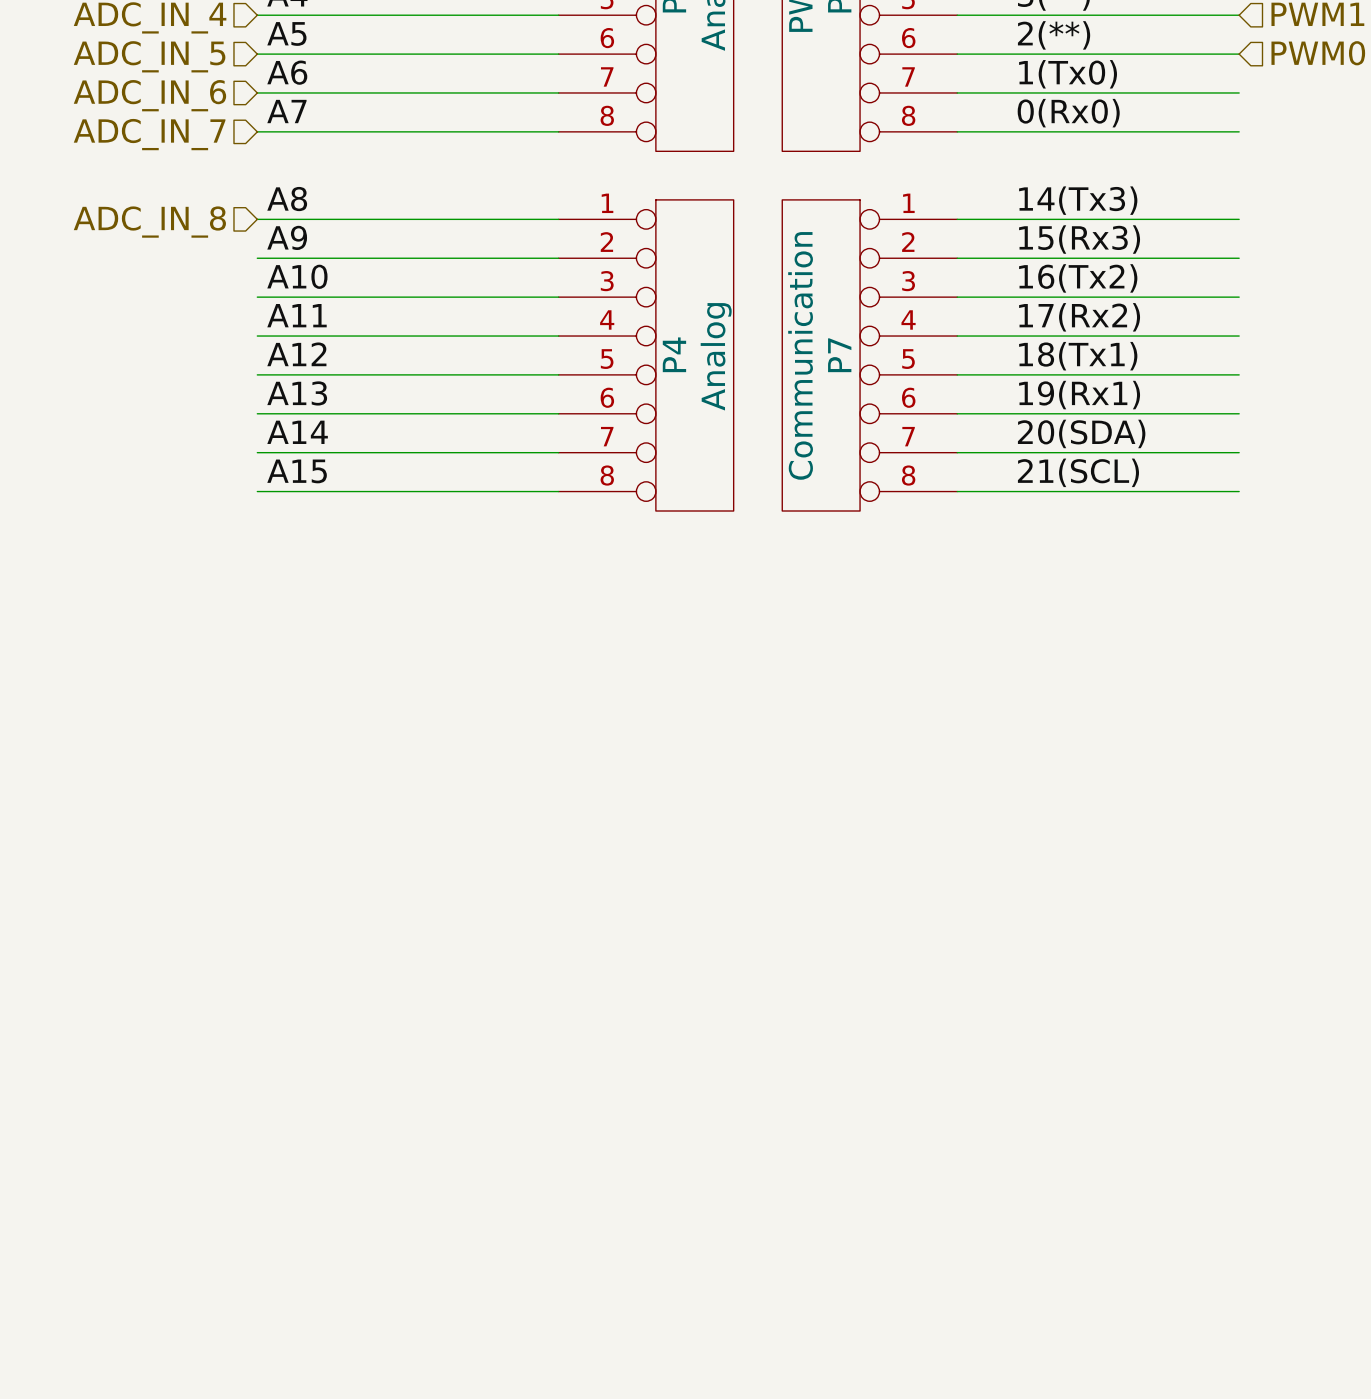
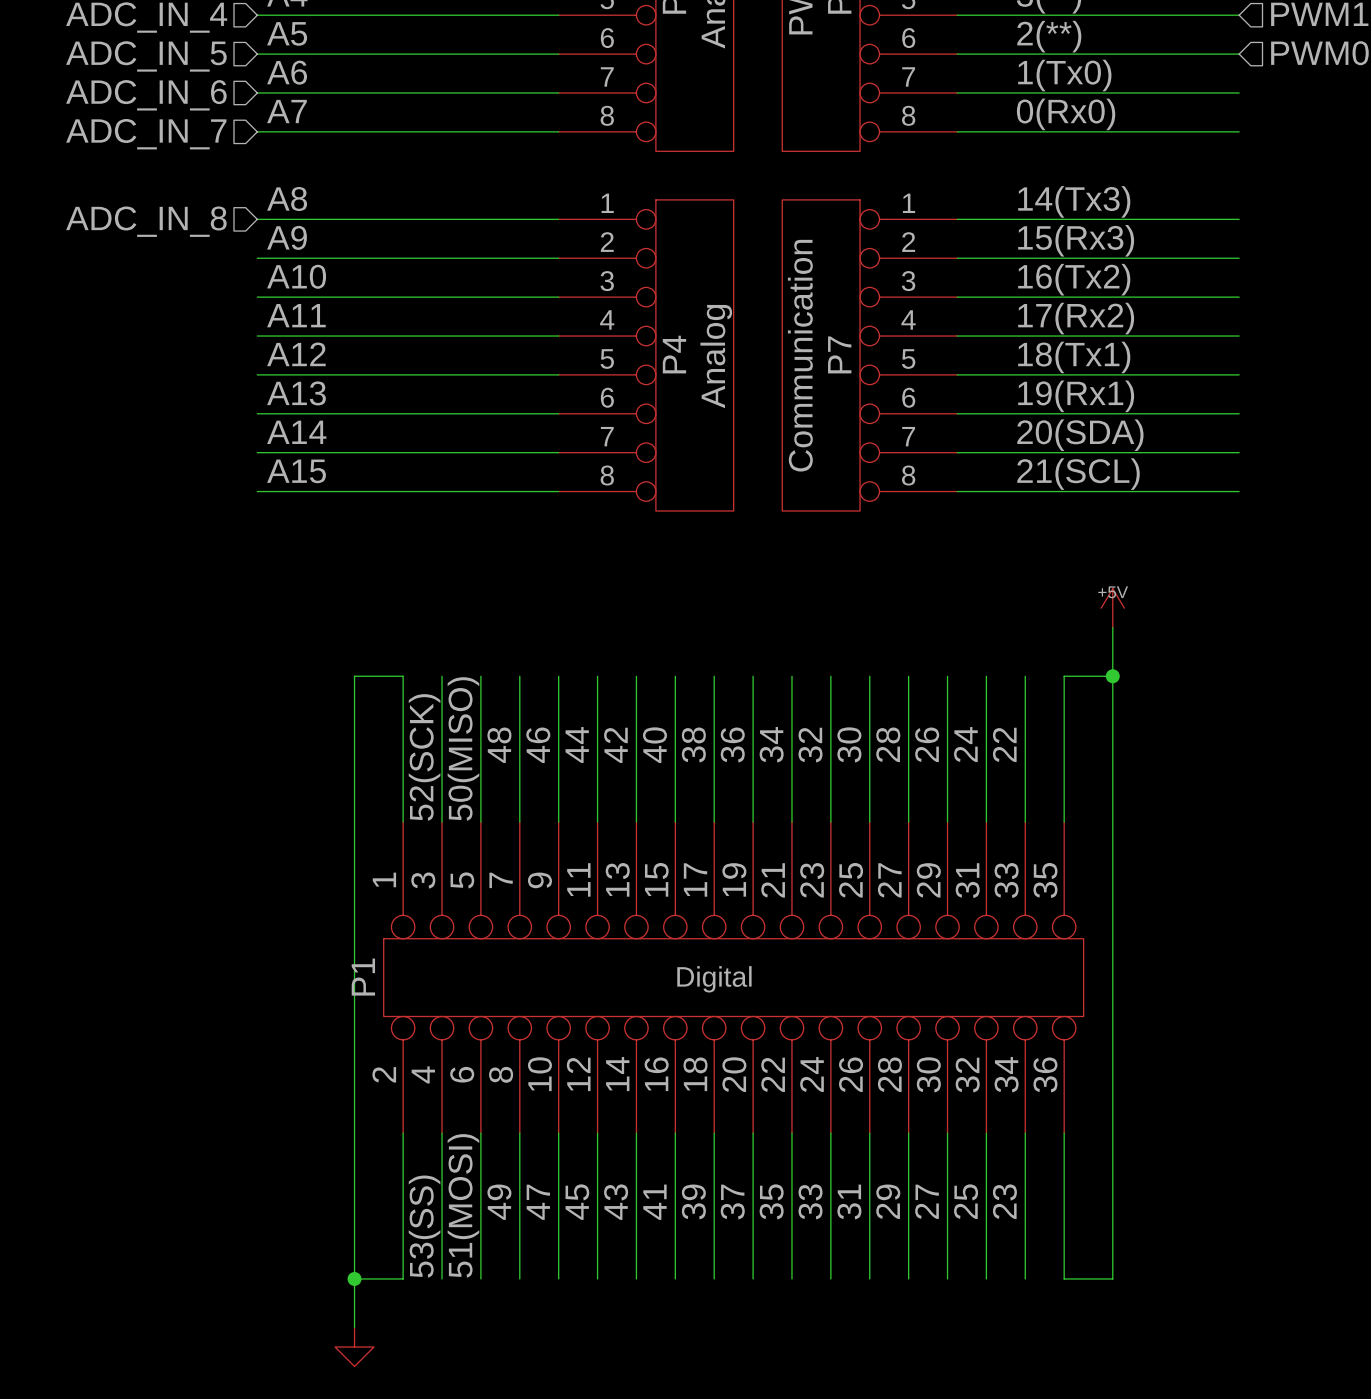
power symbol: none -> +5V (1112, 608)
wire: none -> (1112, 627) (1112, 1278) (1064, 1278) (1064, 1133)
wire: none -> (442, 676) (442, 822)
wire: none -> (480, 676) (480, 822)
wire: none -> (519, 676) (519, 822)
wire: none -> (558, 676) (558, 822)
wire: none -> (597, 676) (597, 822)
wire: none -> (636, 676) (636, 822)
wire: none -> (675, 676) (675, 822)
wire: none -> (714, 676) (714, 822)
wire: none -> (753, 676) (753, 822)
wire: none -> (791, 676) (791, 822)
wire: none -> (830, 676) (830, 822)
wire: none -> (869, 676) (869, 822)
wire: none -> (908, 676) (908, 822)
wire: none -> (947, 676) (947, 822)
wire: none -> (986, 676) (986, 822)
wire: none -> (1025, 676) (1025, 822)
wire: none -> (1112, 676) (1064, 676) (1064, 822)
junction: none -> (1112, 676)
label: none -> 48 (499, 745)
label: none -> 46 (538, 745)
label: none -> 44 (577, 745)
label: none -> 40 (654, 745)
label: none -> 38 (693, 744)
label: none -> 36 (732, 744)
label: none -> 34 (771, 744)
label: none -> 32 (810, 745)
label: none -> 30 (849, 744)
label: none -> 28 (888, 744)
label: none -> 26 (927, 744)
label: none -> 24 (965, 744)
label: none -> 22 (1004, 744)
label: none -> 42 (615, 745)
label: none -> 50(MISO) (463, 748)
label: none -> 52(SCK) (424, 757)
wire: none -> (403, 822) (403, 676) (354, 676) (354, 1327)
P1: none -> Digital (733, 977)
wire: none -> (403, 1133) (403, 1278) (354, 1278)
wire: none -> (442, 1133) (442, 1278)
wire: none -> (480, 1133) (480, 1278)
wire: none -> (519, 1133) (519, 1278)
wire: none -> (558, 1133) (558, 1278)
wire: none -> (597, 1133) (597, 1278)
wire: none -> (636, 1133) (636, 1278)
wire: none -> (675, 1133) (675, 1278)
wire: none -> (714, 1133) (714, 1278)
wire: none -> (753, 1133) (753, 1278)
wire: none -> (791, 1133) (791, 1278)
wire: none -> (830, 1133) (830, 1278)
wire: none -> (869, 1133) (869, 1278)
wire: none -> (908, 1133) (908, 1278)
wire: none -> (947, 1133) (947, 1278)
wire: none -> (986, 1133) (986, 1278)
wire: none -> (1025, 1133) (1025, 1278)
label: none -> 49 (499, 1202)
label: none -> 47 (538, 1202)
label: none -> 45 (577, 1202)
label: none -> 43 (616, 1202)
label: none -> 41 (654, 1202)
label: none -> 39 (693, 1201)
label: none -> 37 (732, 1201)
label: none -> 35 (771, 1201)
label: none -> 33 (810, 1201)
label: none -> 31 (849, 1201)
label: none -> 29 (888, 1201)
label: none -> 27 (926, 1201)
label: none -> 25 (966, 1201)
label: none -> 23 (1004, 1201)
label: none -> 51(MOSI) (463, 1205)
label: none -> 53(SS) (424, 1226)
junction: none -> (354, 1278)
power symbol: none -> (354, 1347)

